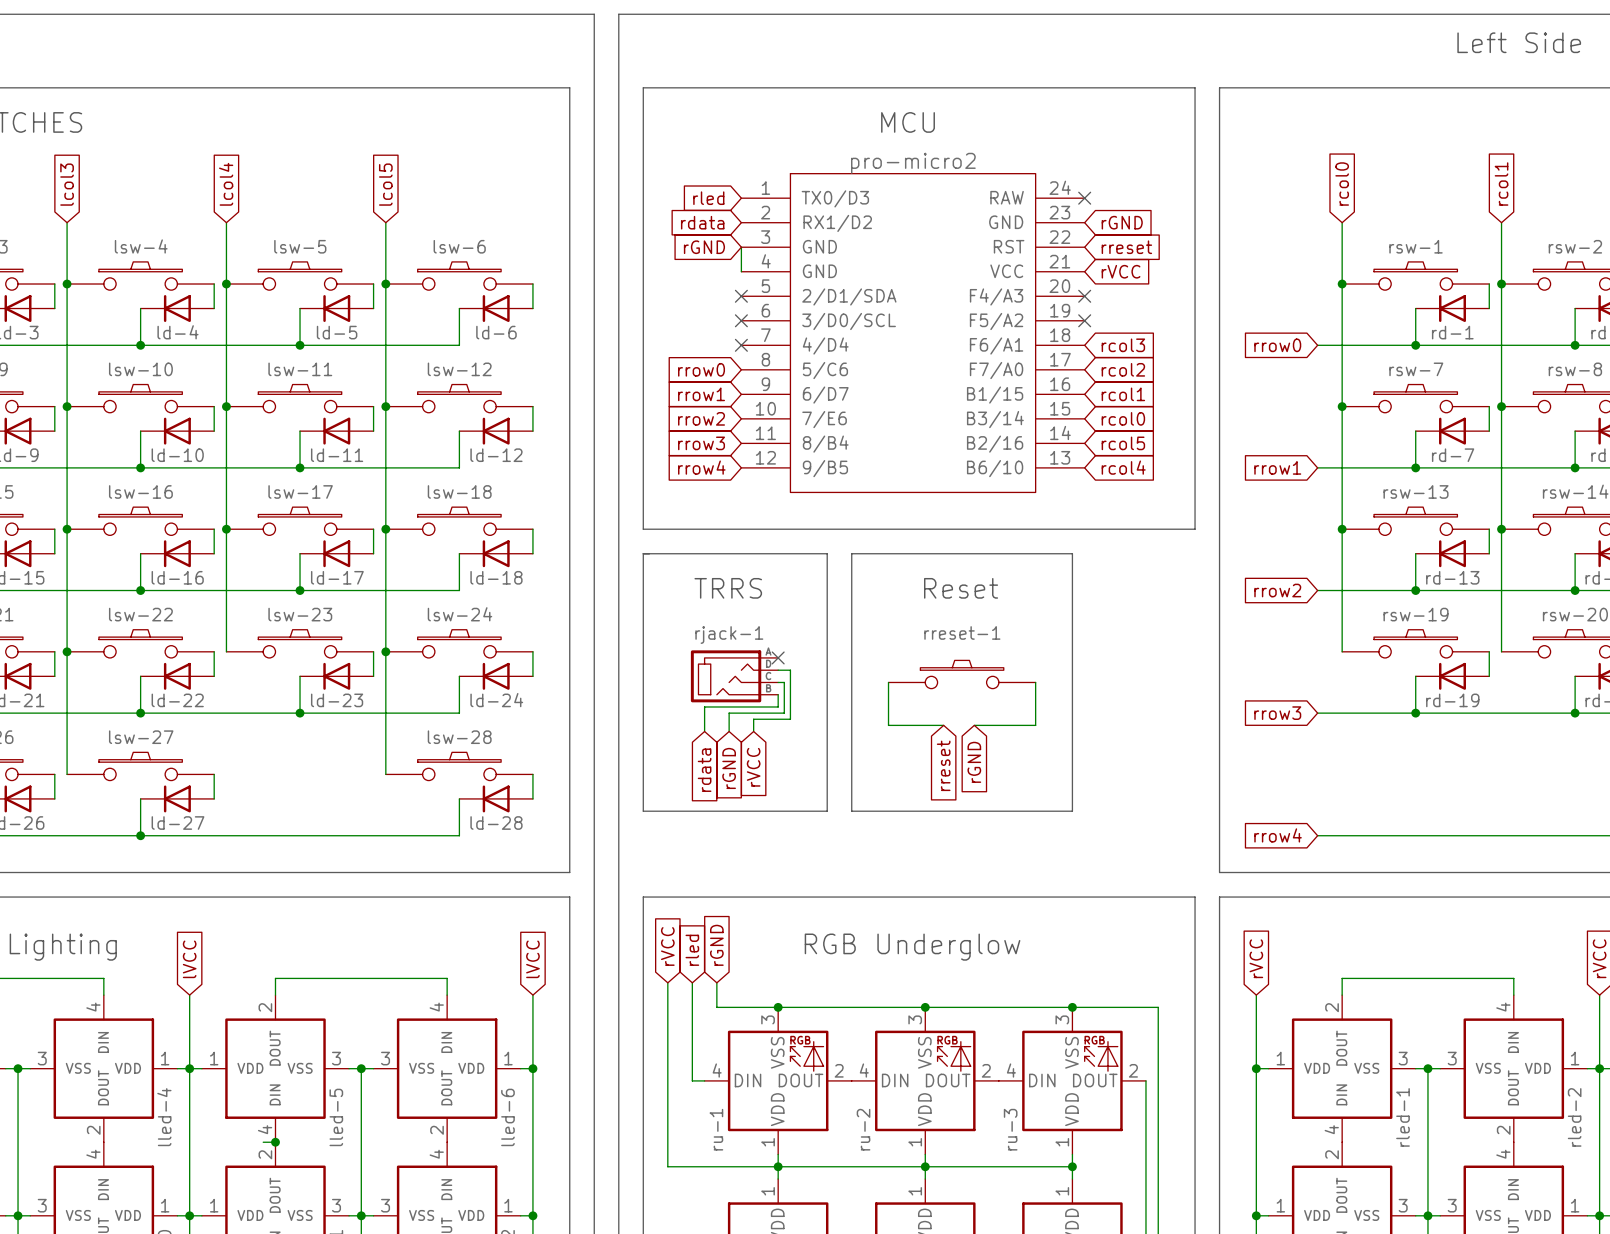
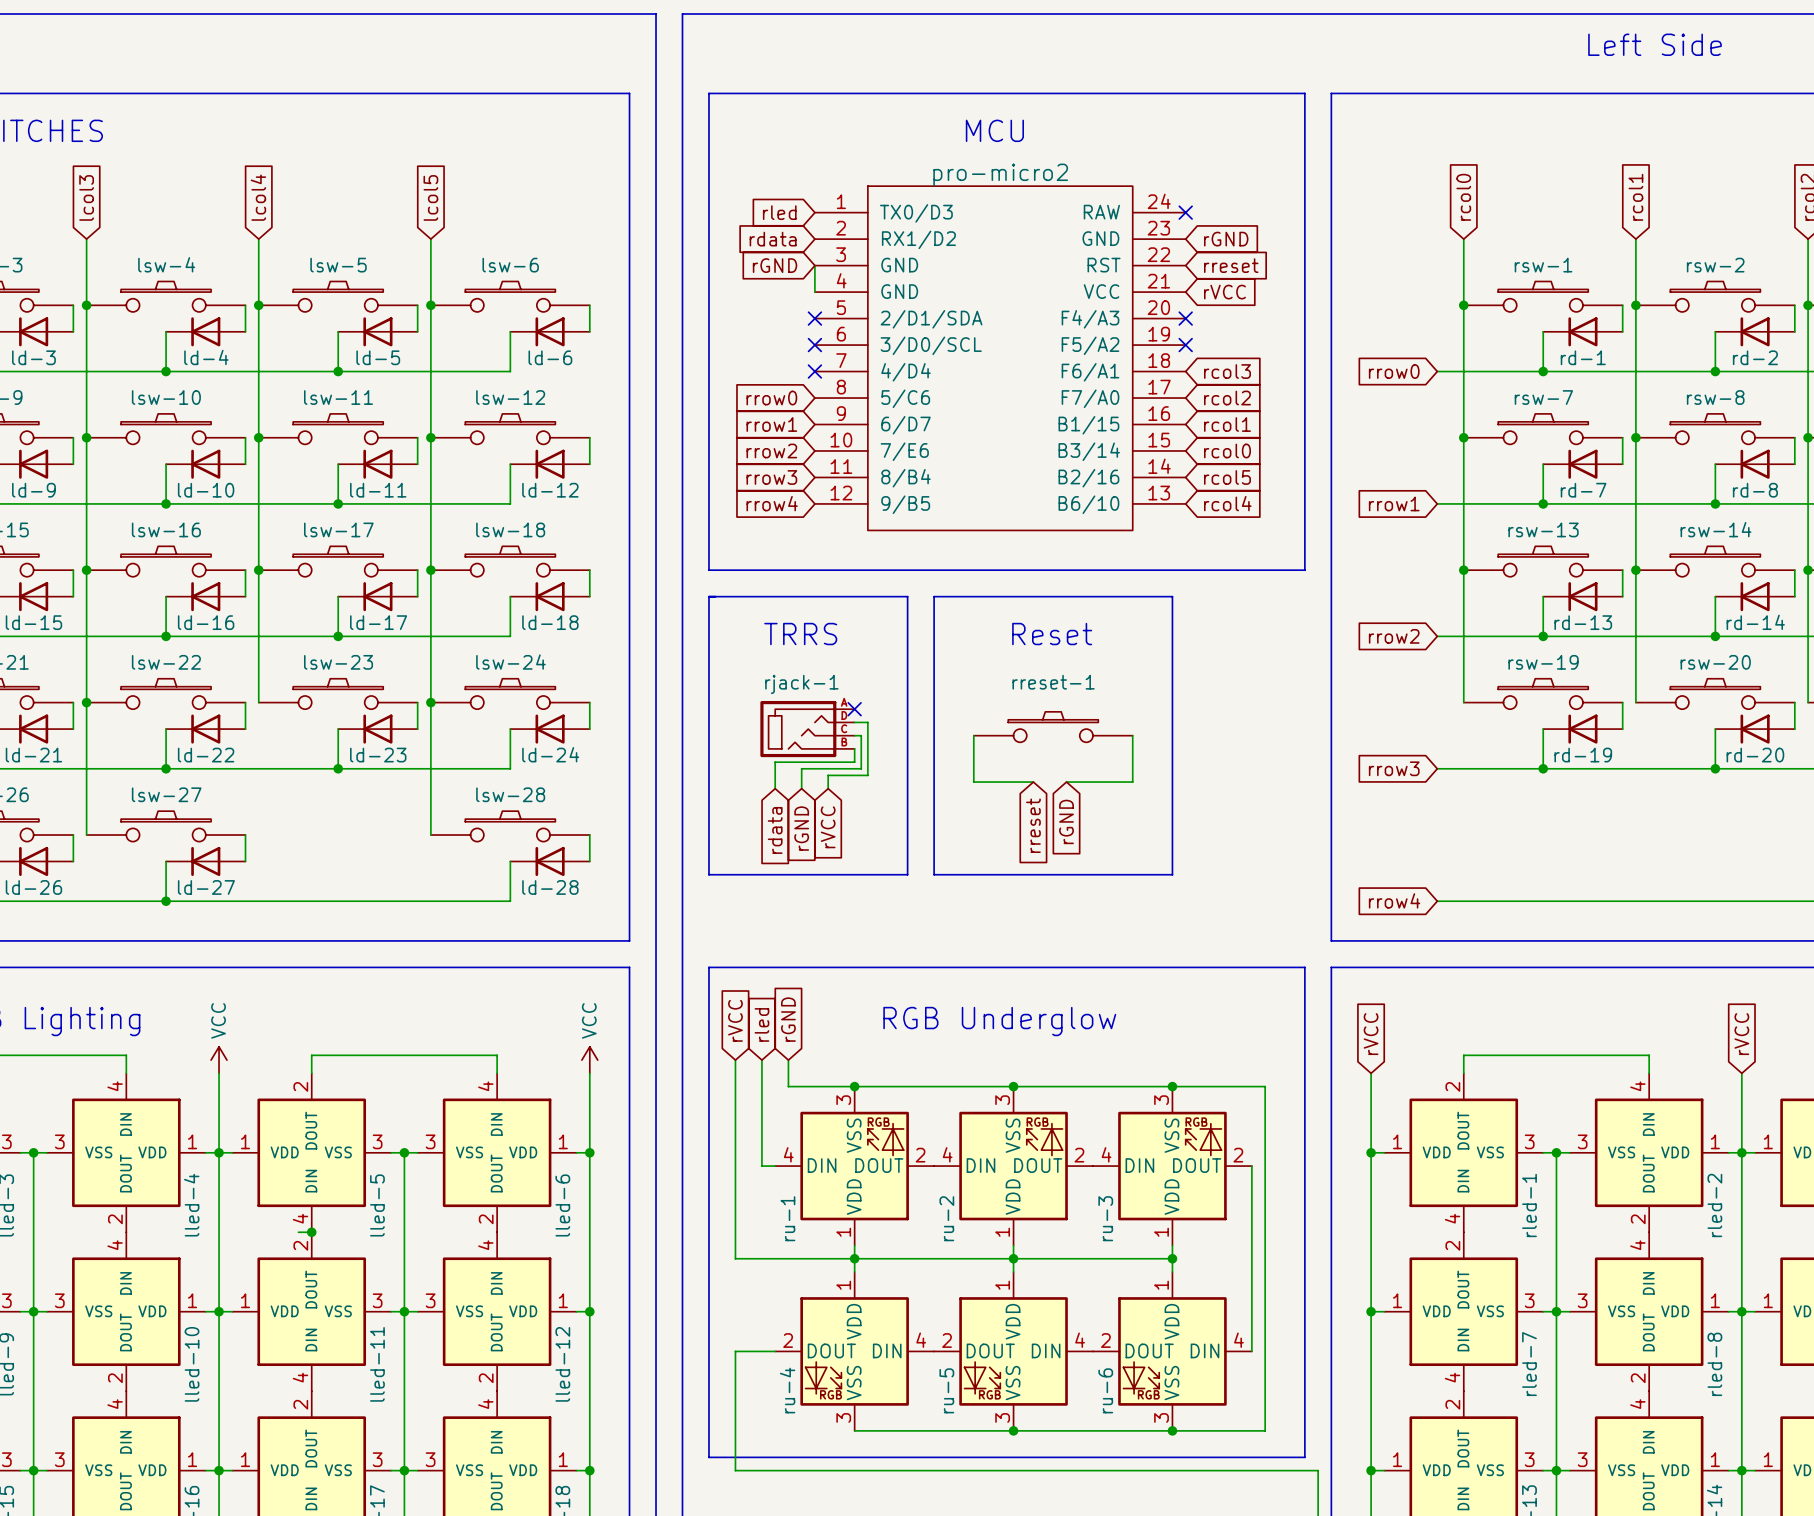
global label: lVCC (189, 959) -> none
global label: lVCC (532, 959) -> none
power symbol: none -> VCC (219, 1060)
power symbol: none -> VCC (589, 1060)

